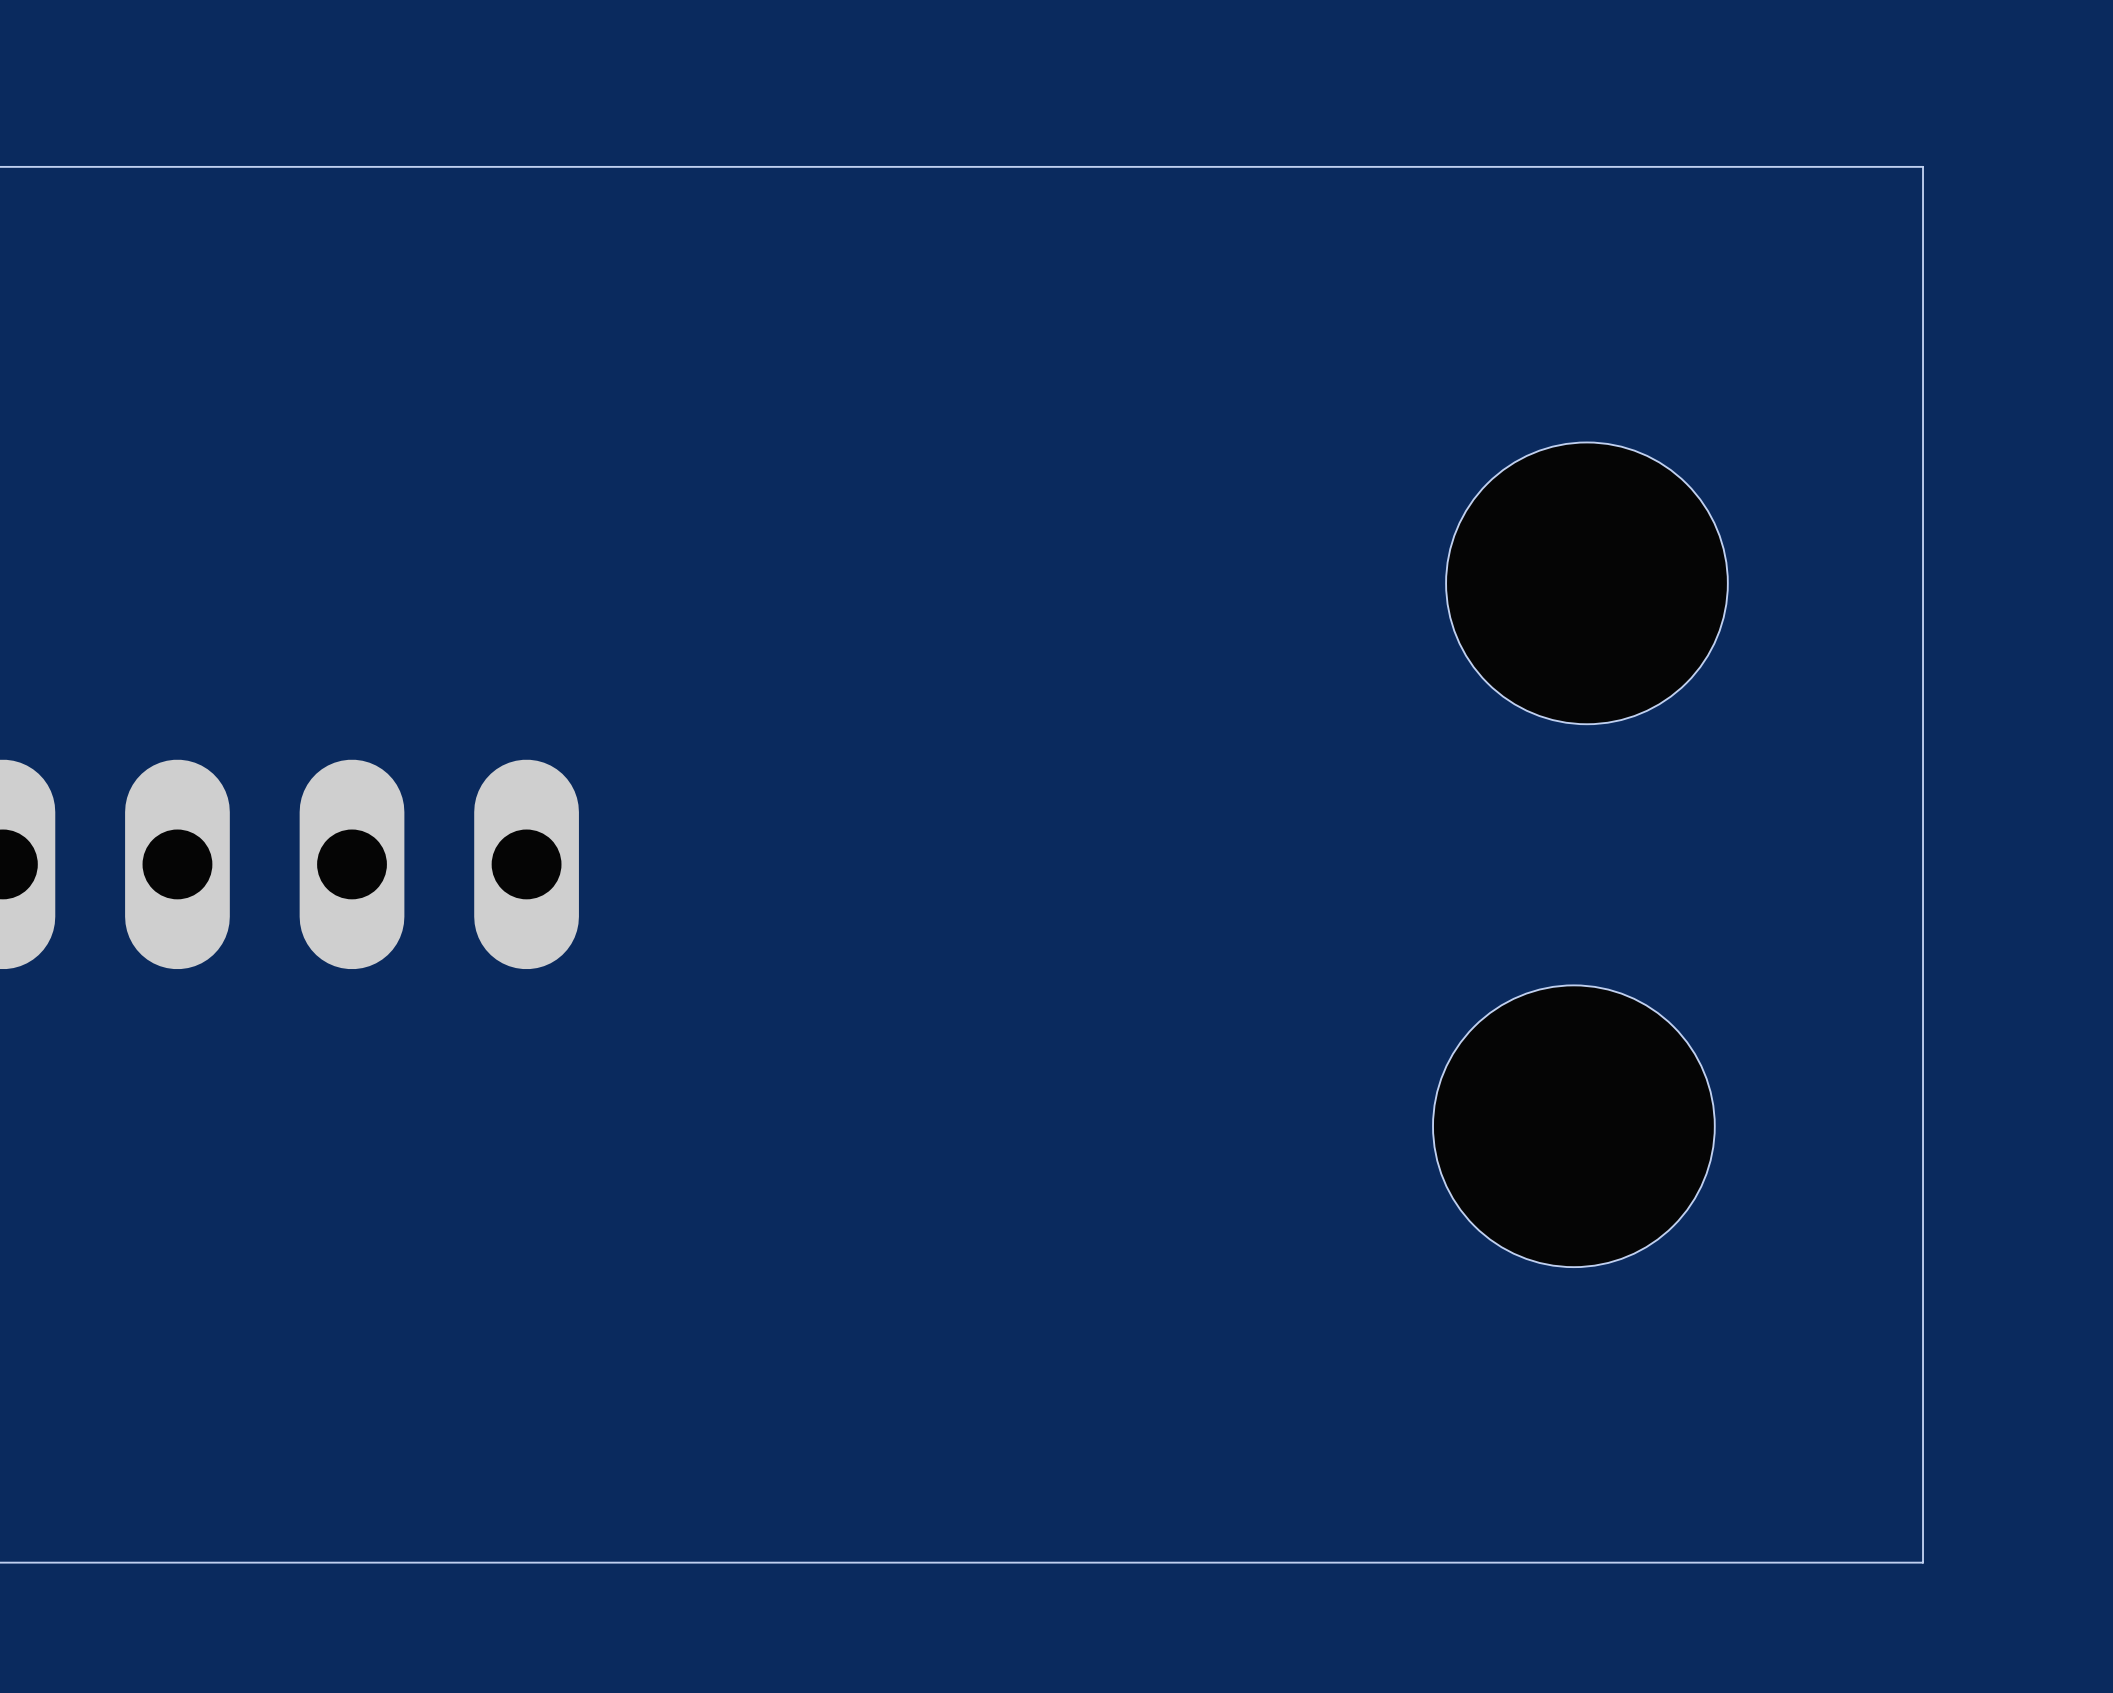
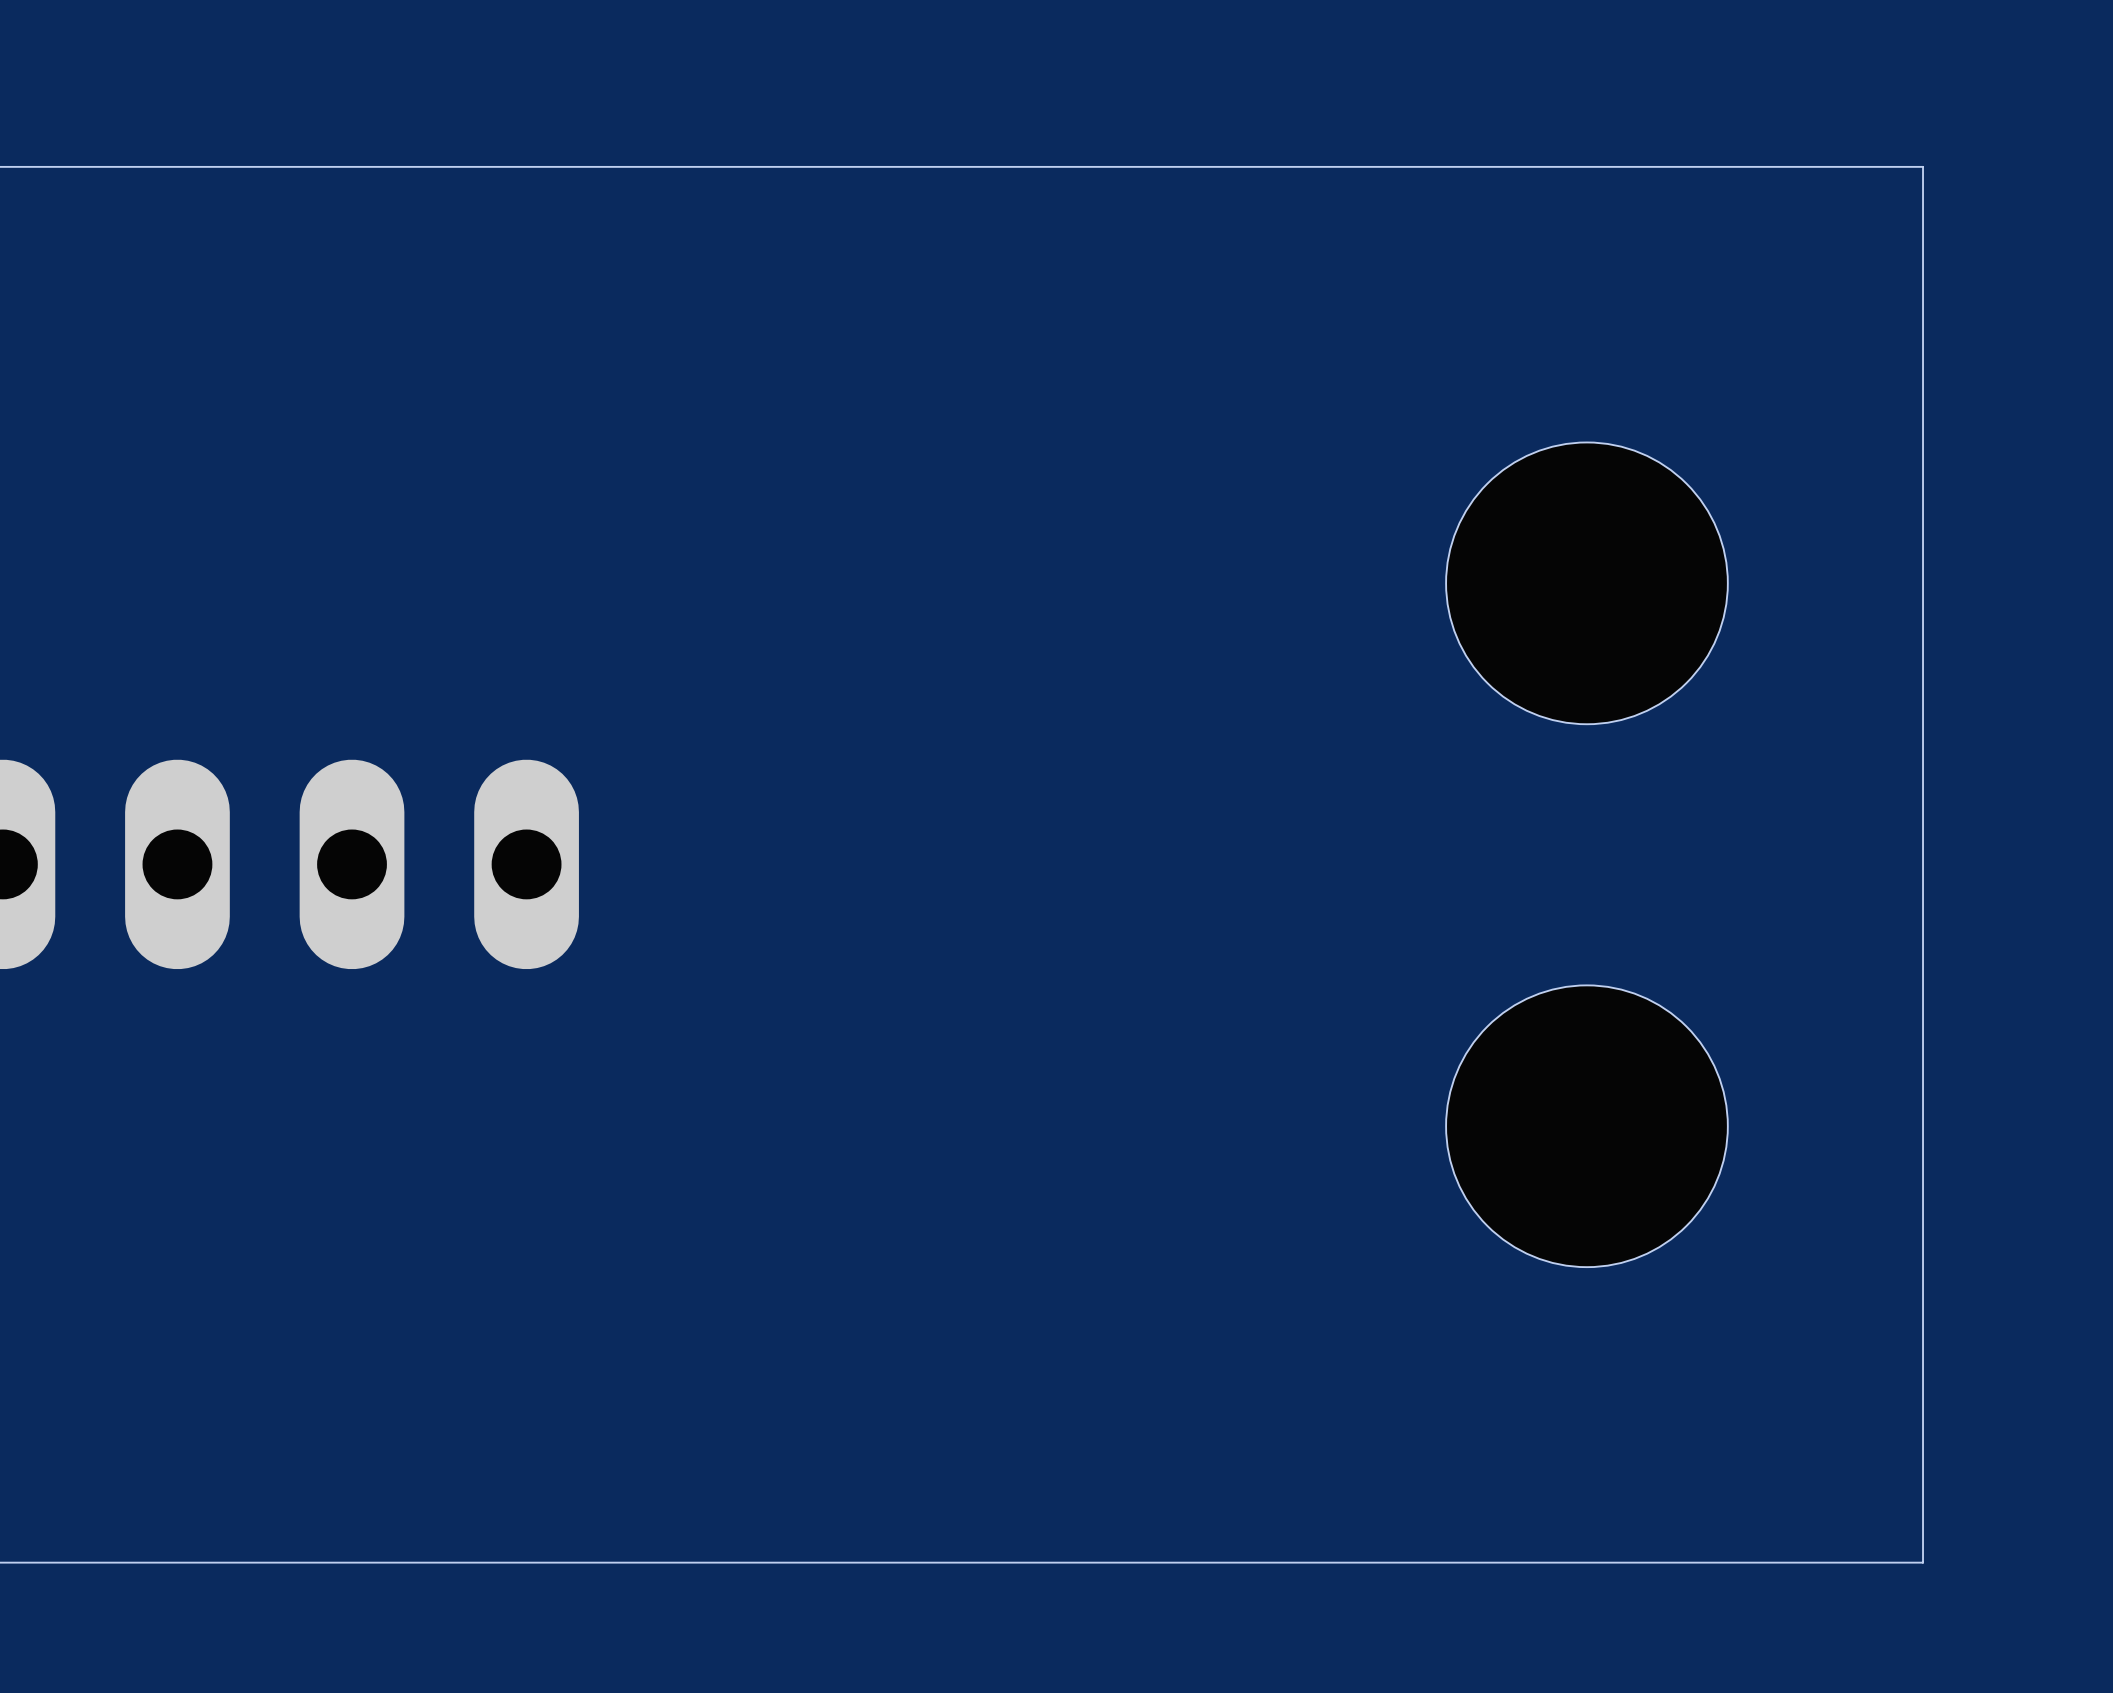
hole position: (1573, 1126) -> (1586, 1126)

